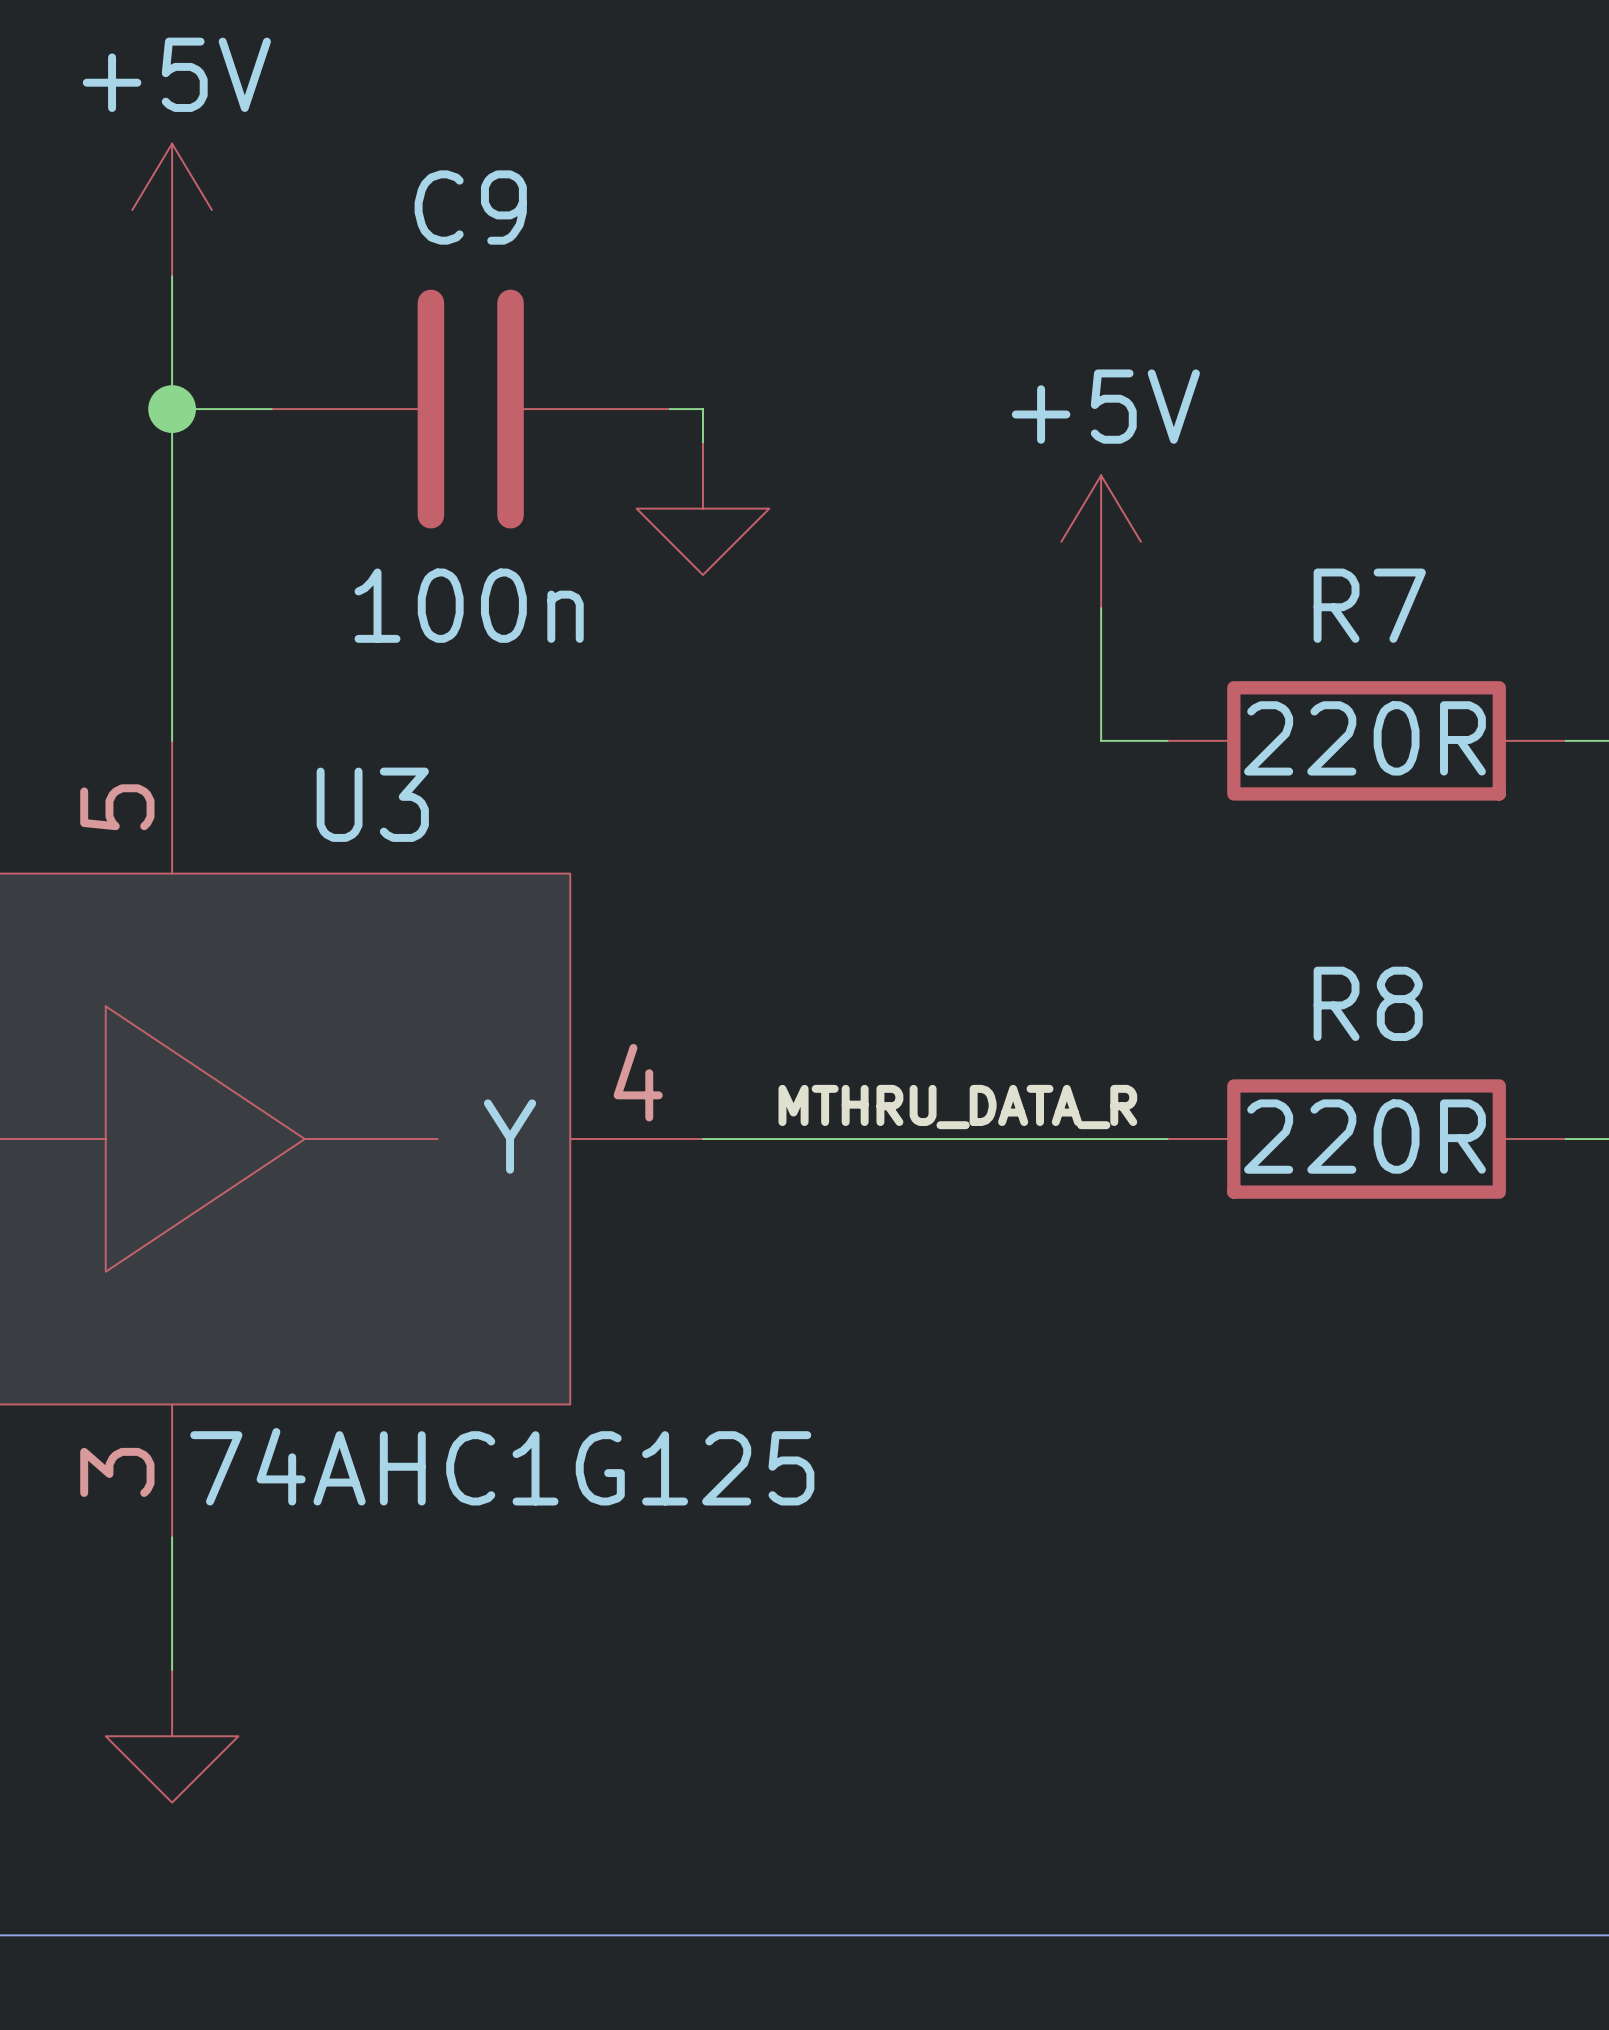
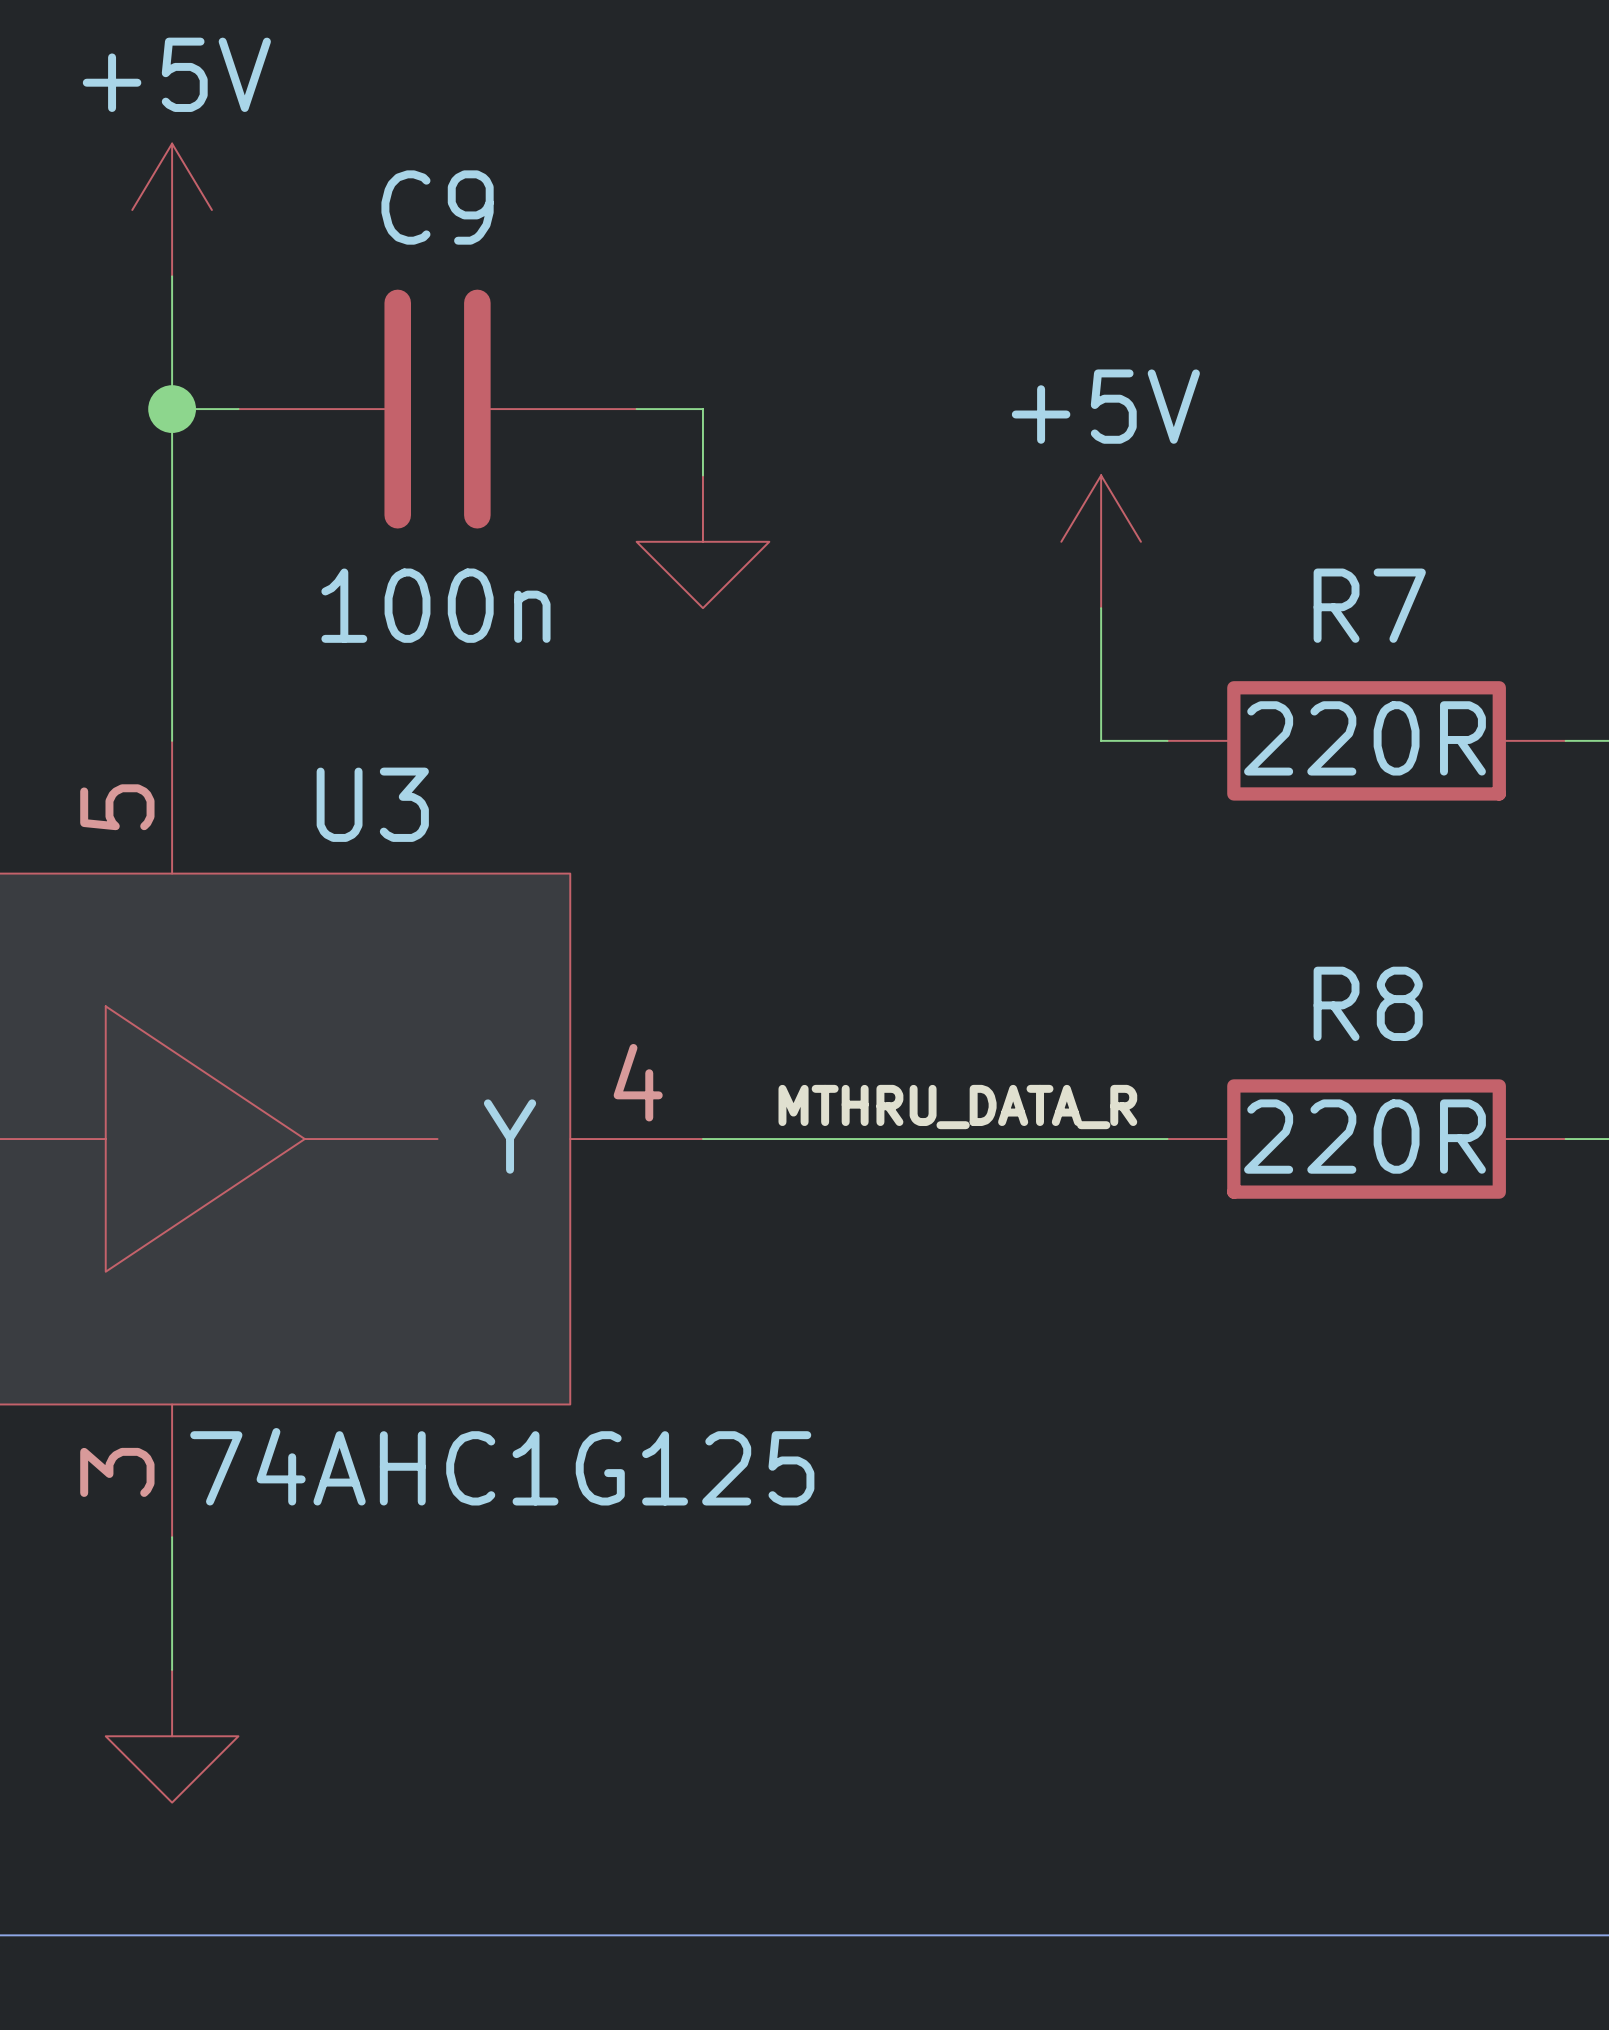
C9 position: (470, 409) -> (437, 409)
power symbol position: (702, 508) -> (702, 541)

